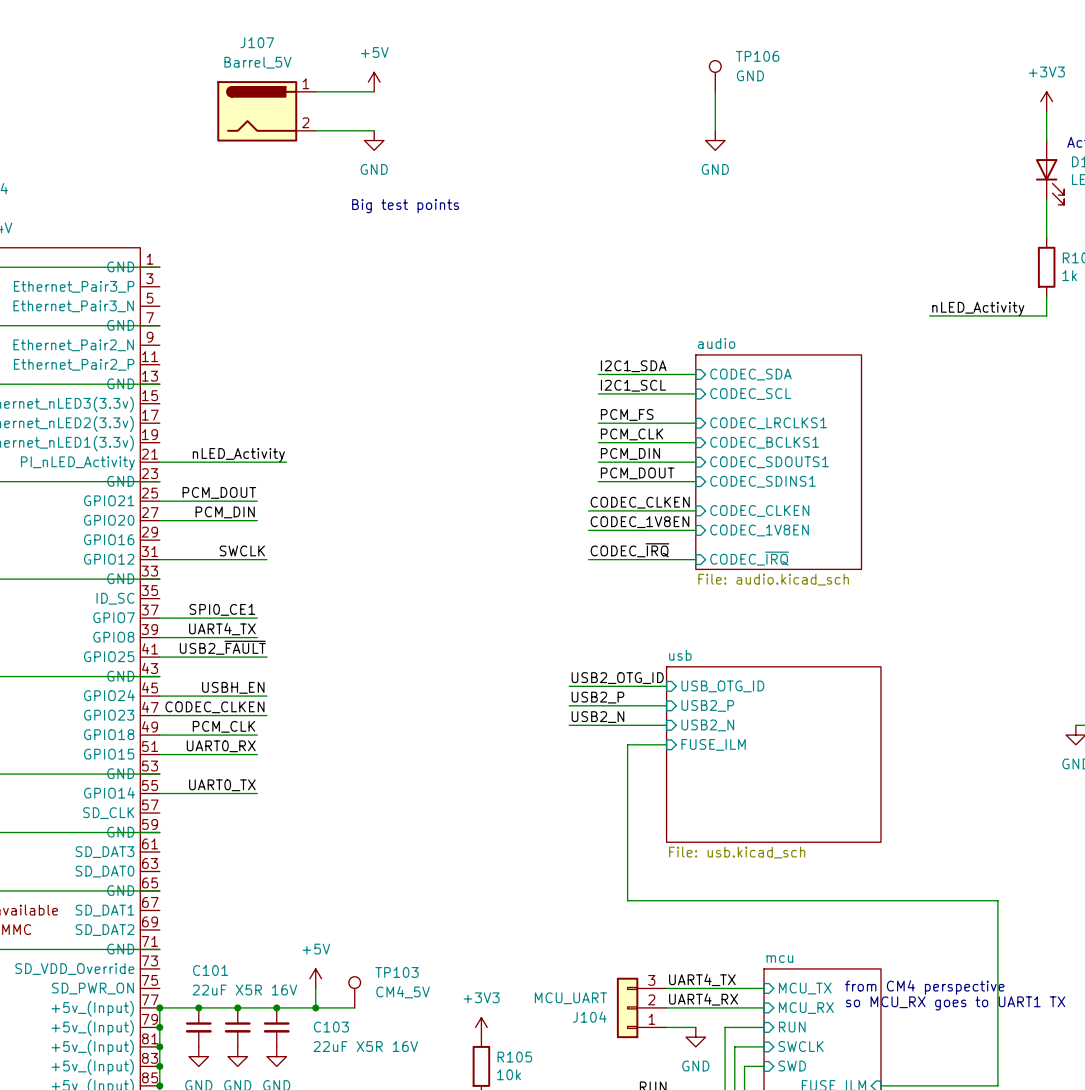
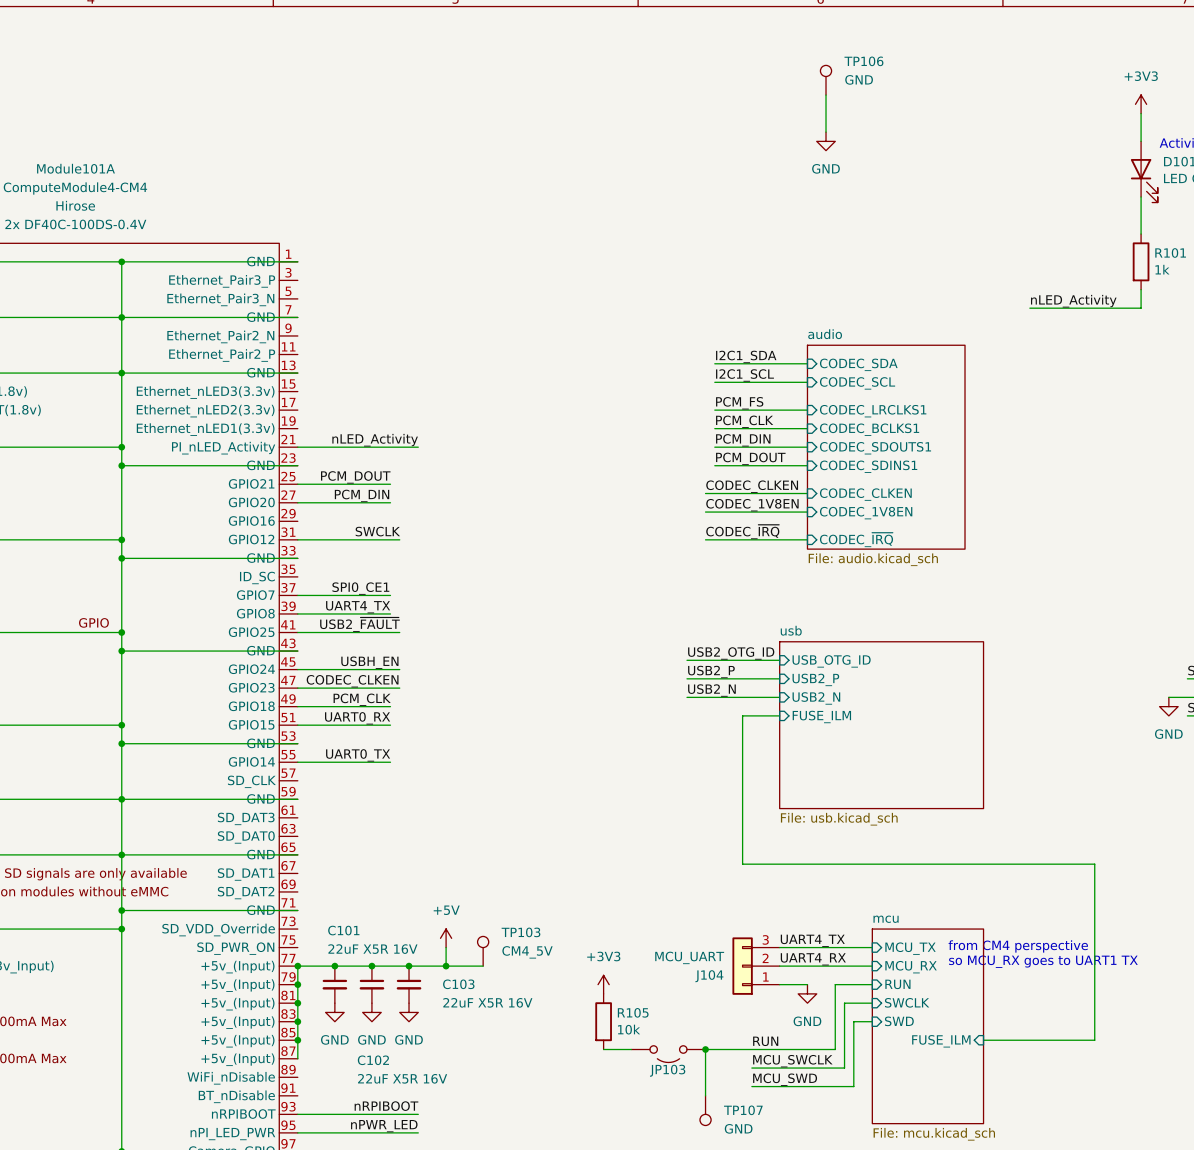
power symbol: +5V (374, 82) -> none
wire: (315, 91) (374, 91) -> none
J107: Barrel_5V (266, 111) -> none
wire: (315, 130) (374, 130) -> none
power symbol: GND (374, 140) -> none
text: Big test points (405, 206) -> none

